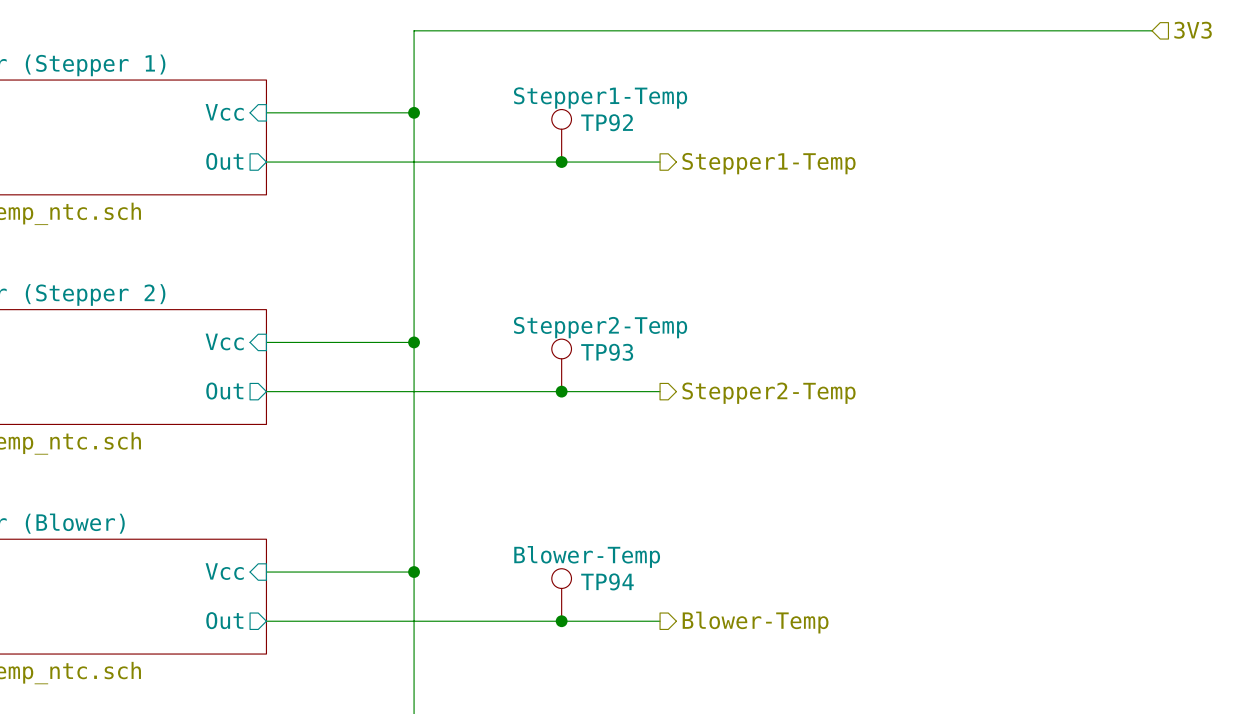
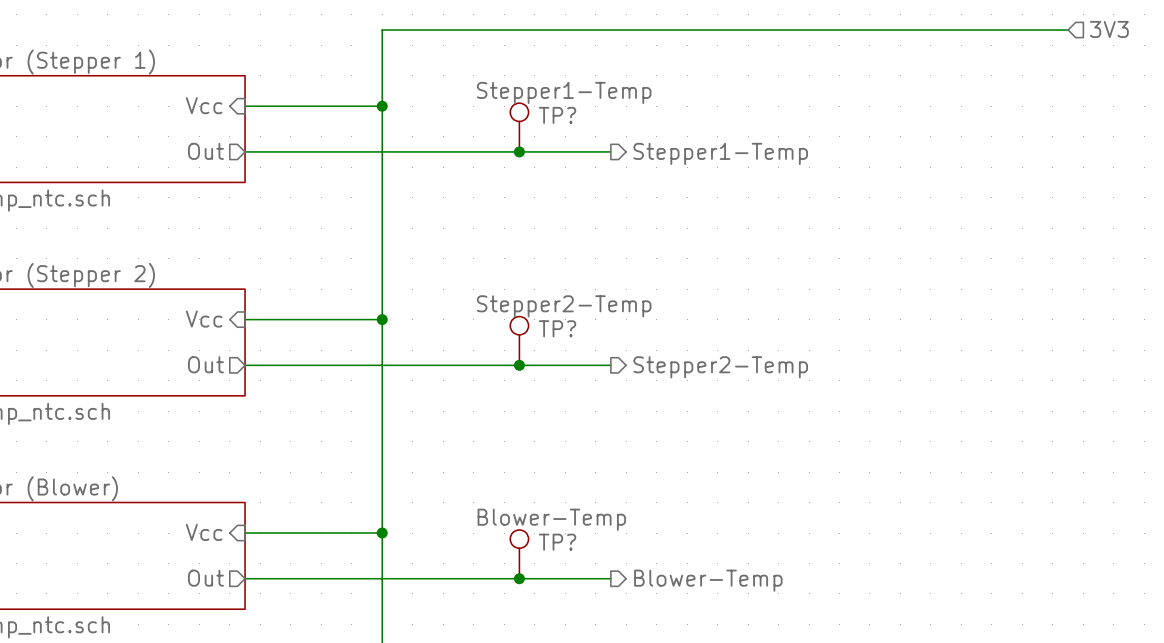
TP92 name: TP92 (607, 122) -> TP? (557, 115)
TP93 name: TP93 (607, 352) -> TP? (557, 328)
TP94 name: TP94 (607, 581) -> TP? (557, 542)

